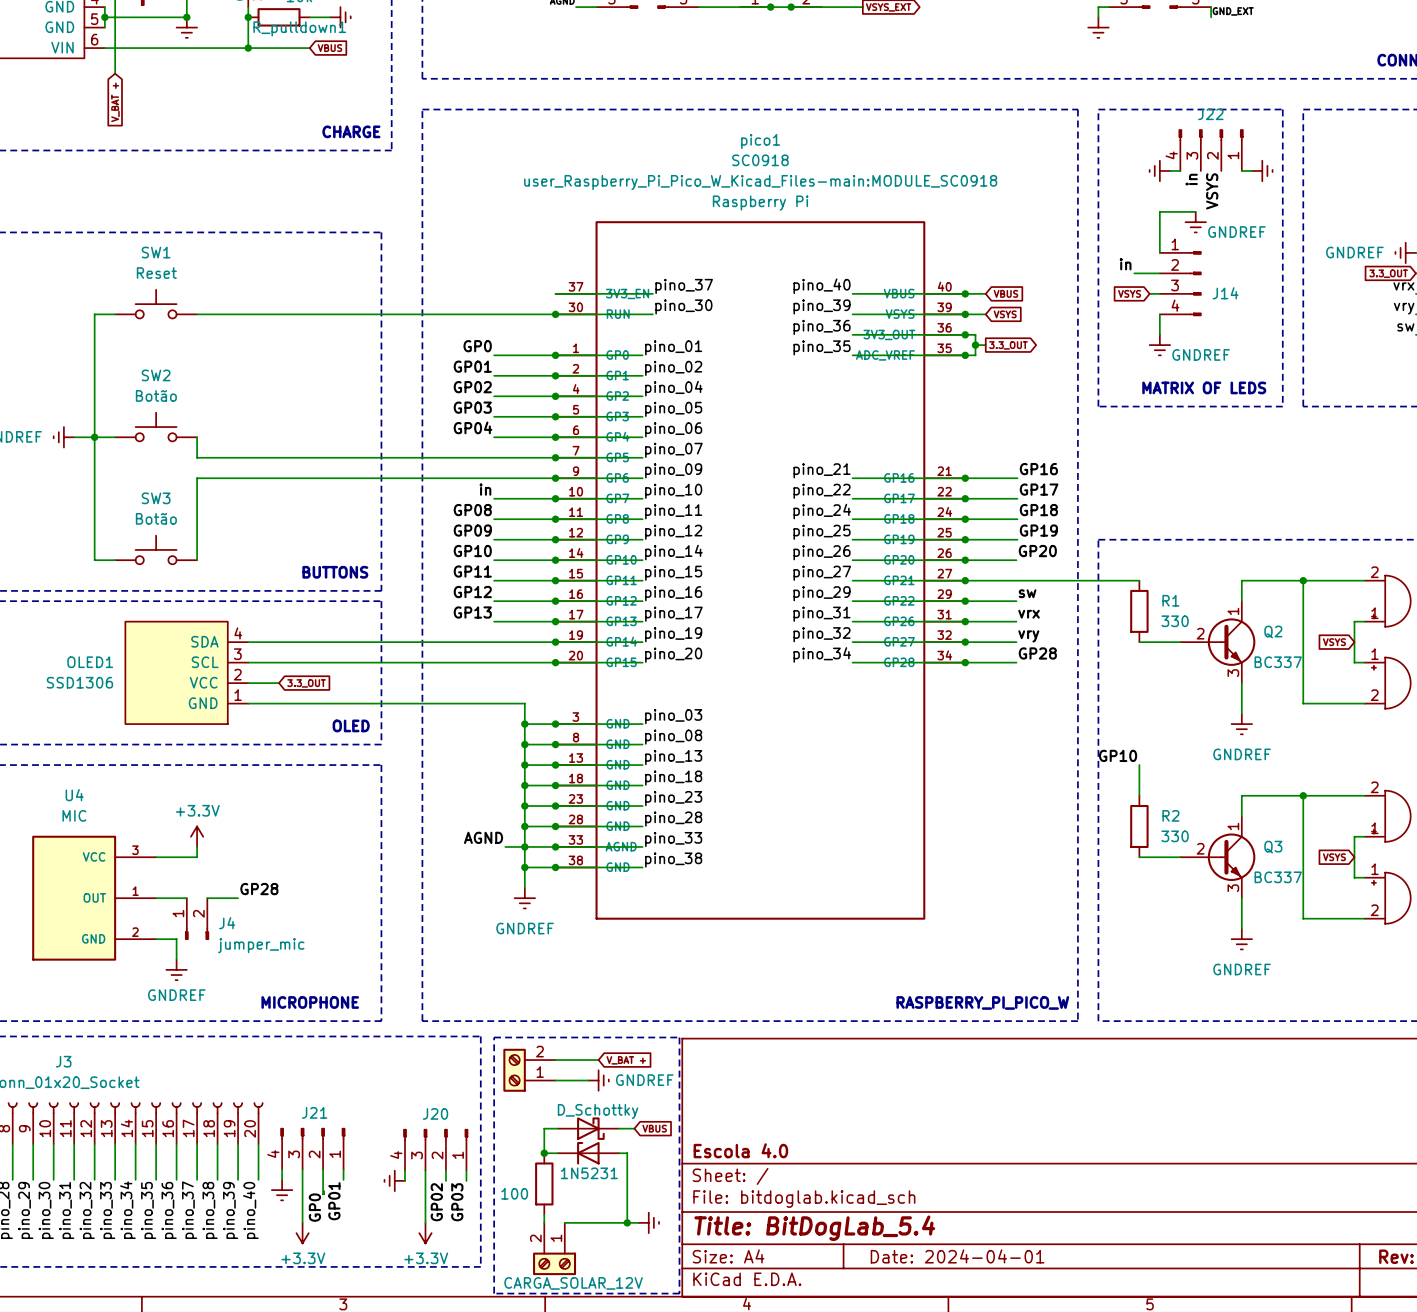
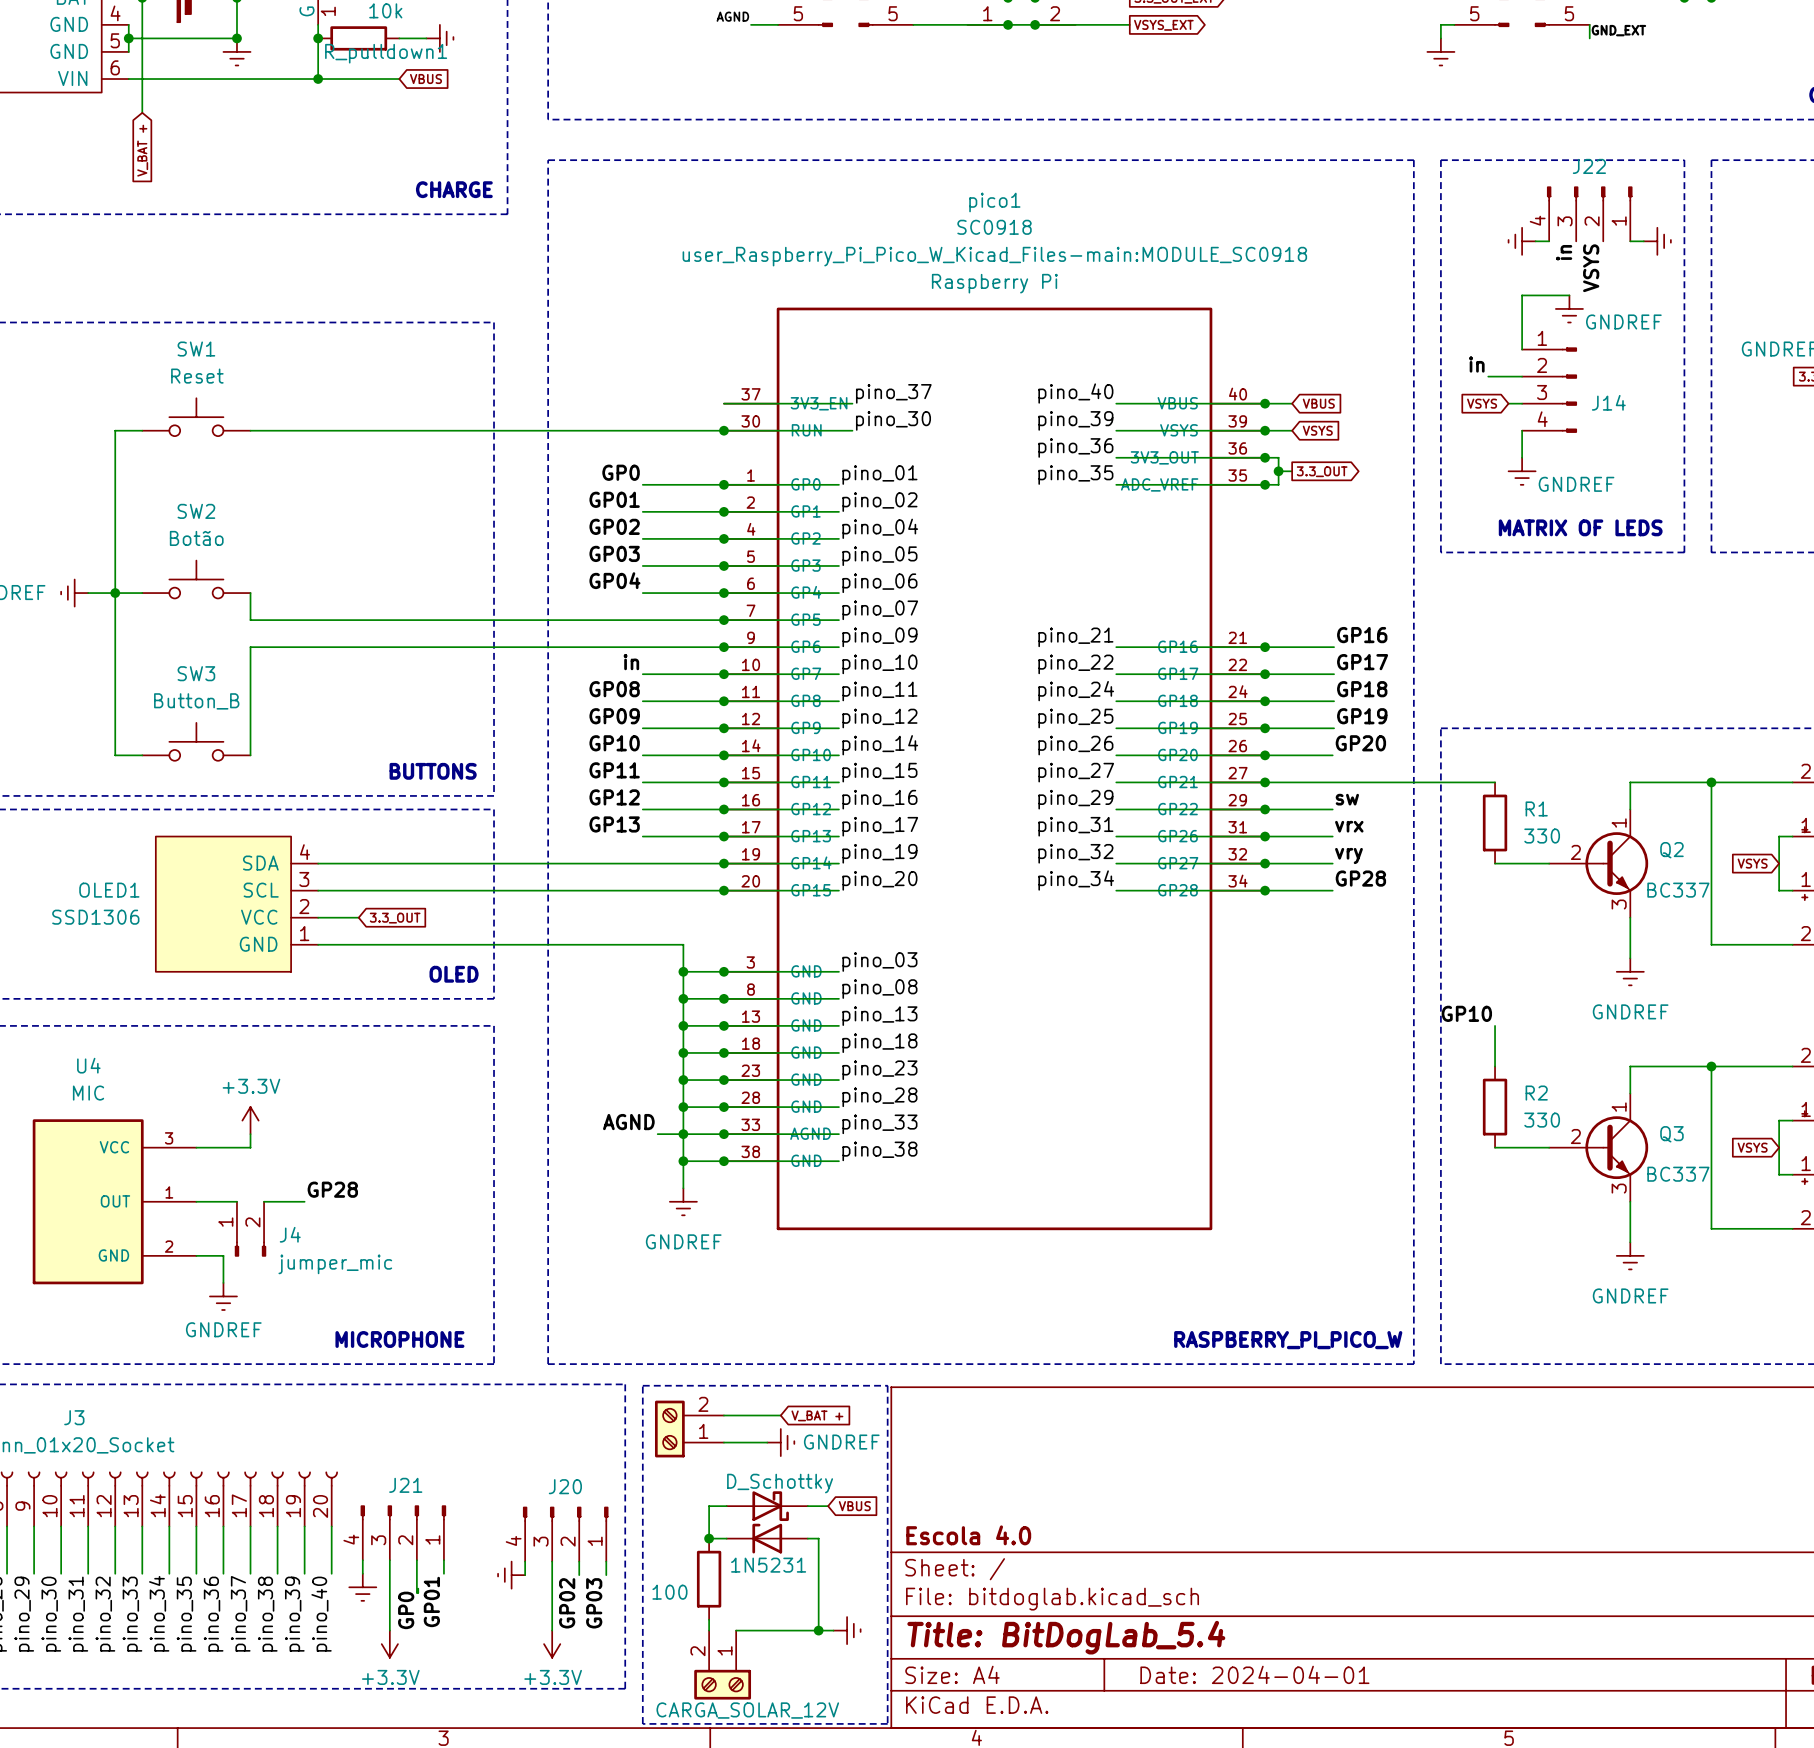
SW3 value: Botão (156, 518) -> Button_B (196, 701)

